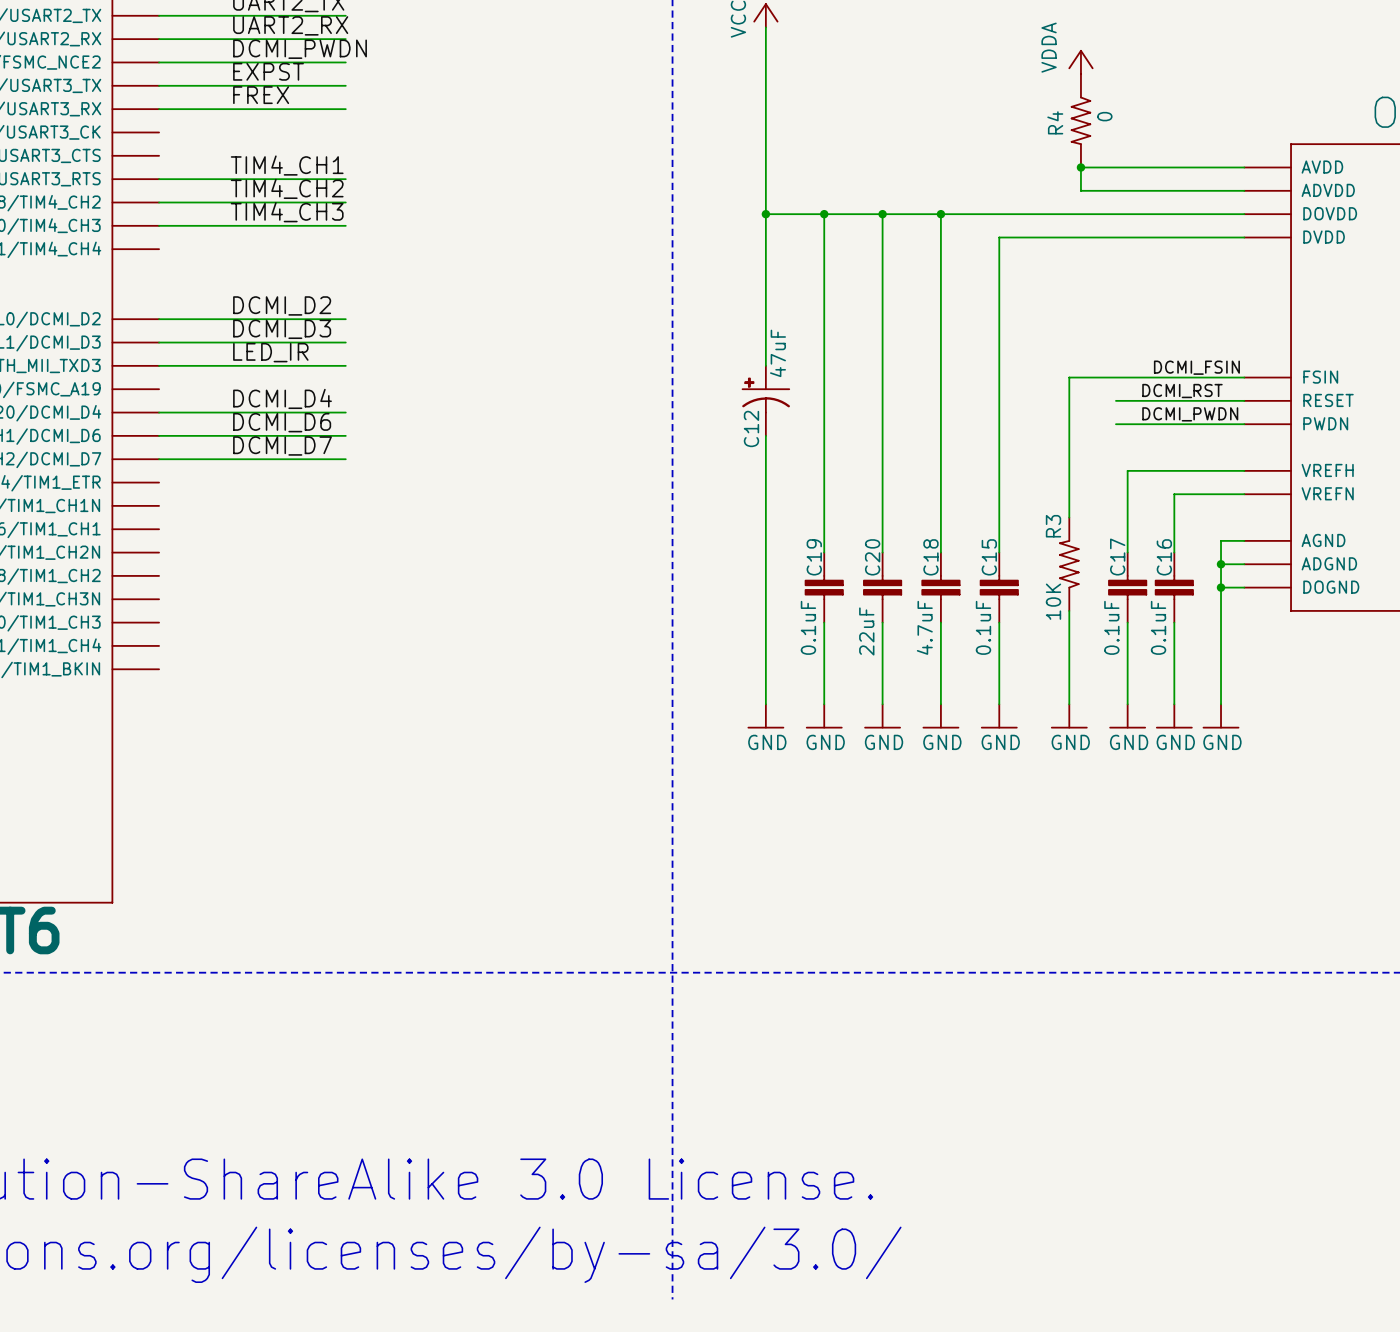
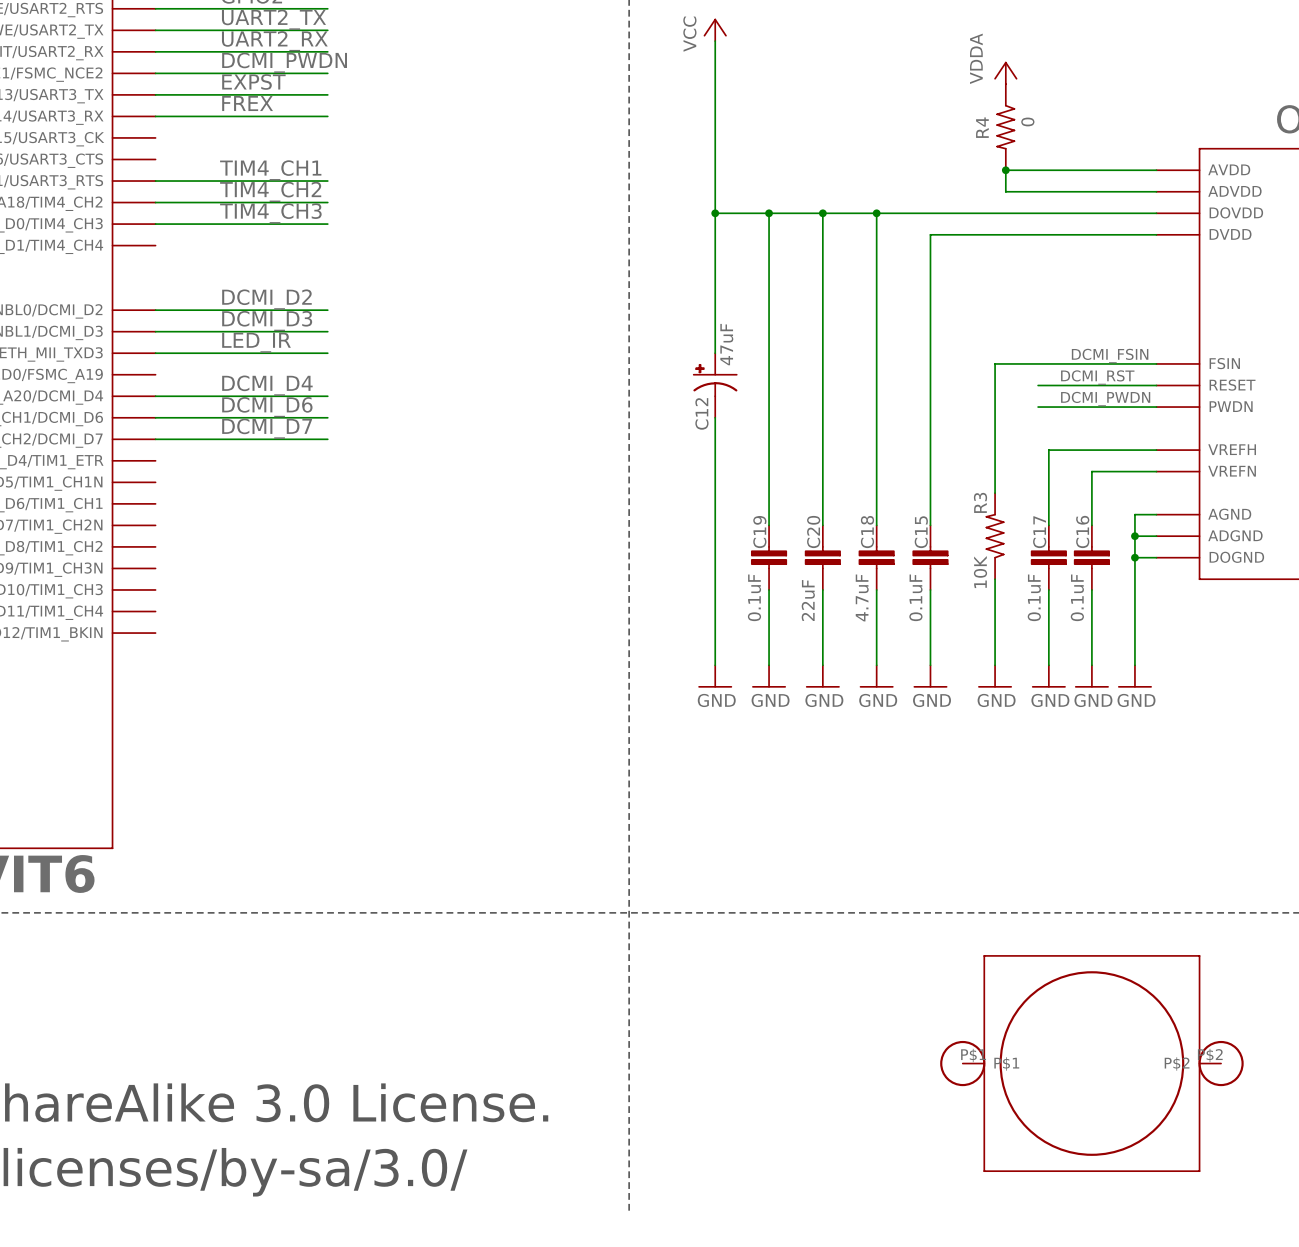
part: none -> (1091, 1063)

